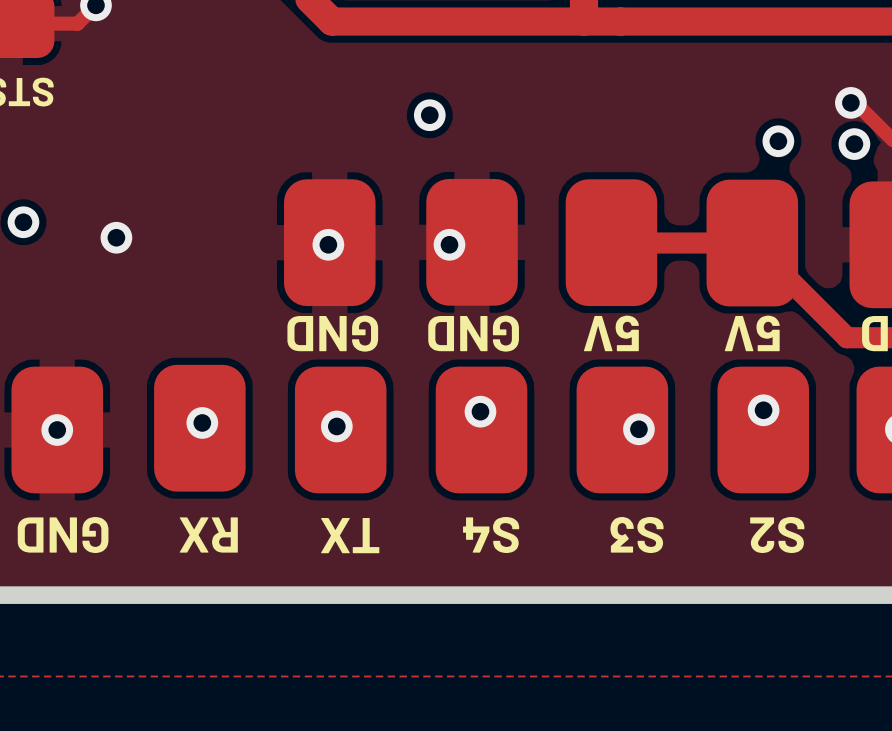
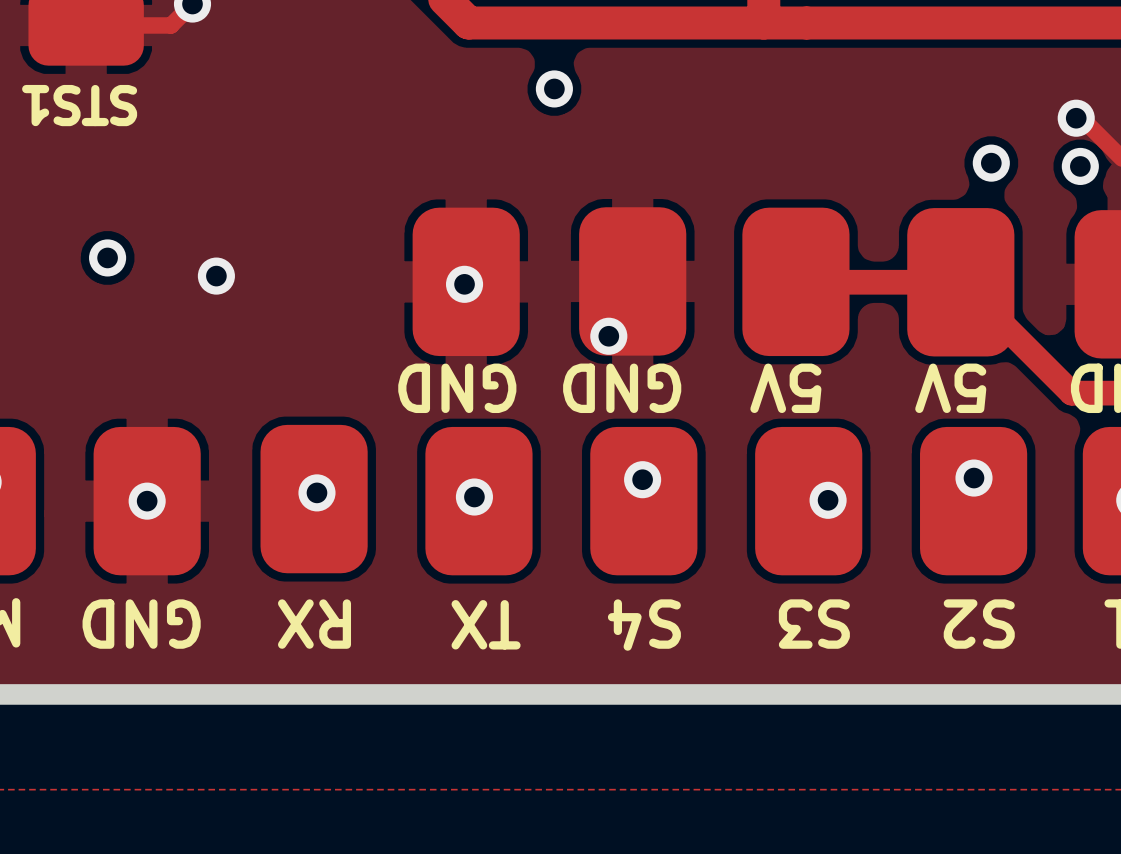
via position: (429, 115) -> (554, 88)
via position: (449, 244) -> (608, 336)

